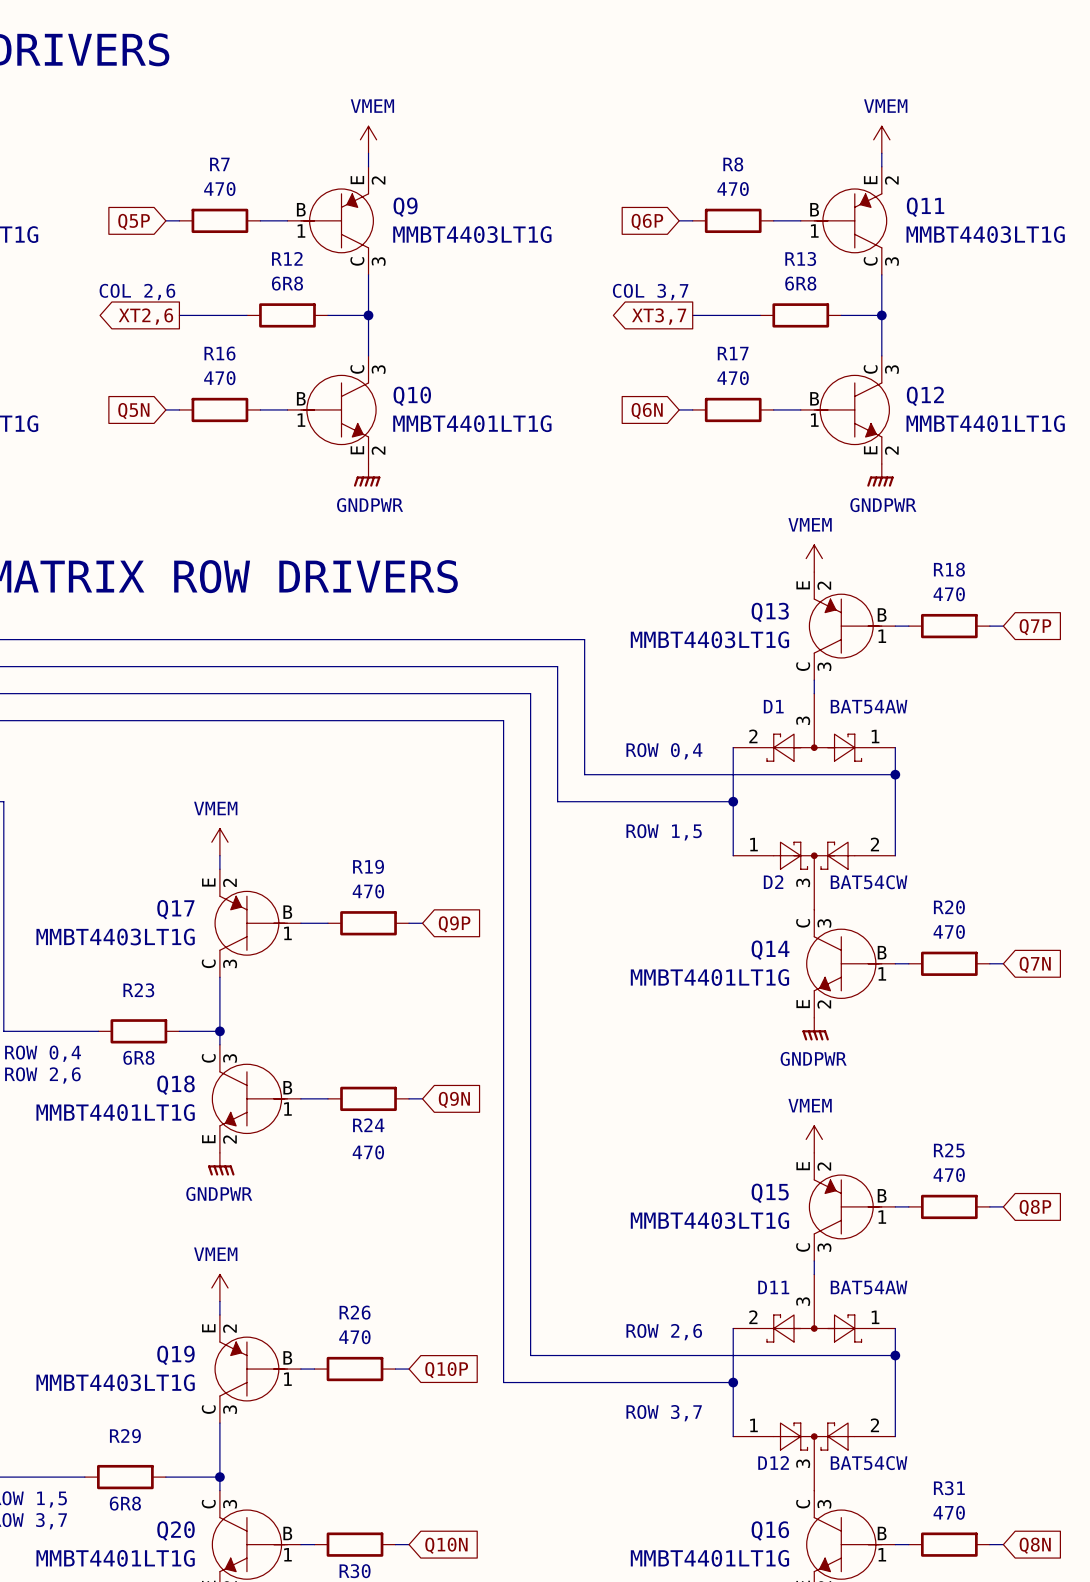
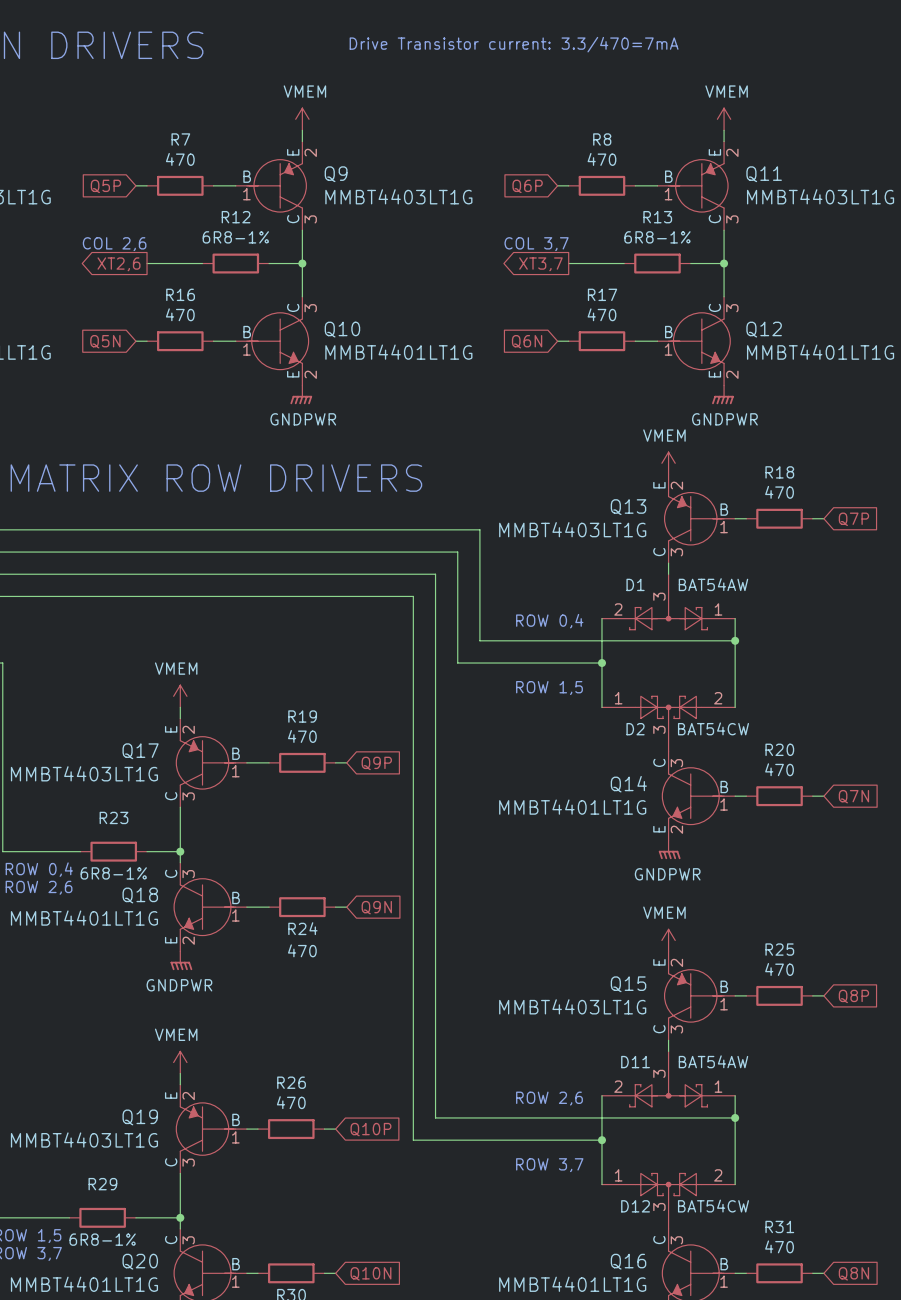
text: none -> Drive Transistor current: 3.3/470=7mA (514, 44)
R12 value: 6R8 (287, 283) -> 6R8-1% (235, 237)
R13 value: 6R8 (800, 283) -> 6R8-1% (657, 237)
R23 value: 6R8 (138, 1057) -> 6R8-1% (113, 873)
R29 value: 6R8 (125, 1503) -> 6R8-1% (102, 1239)

